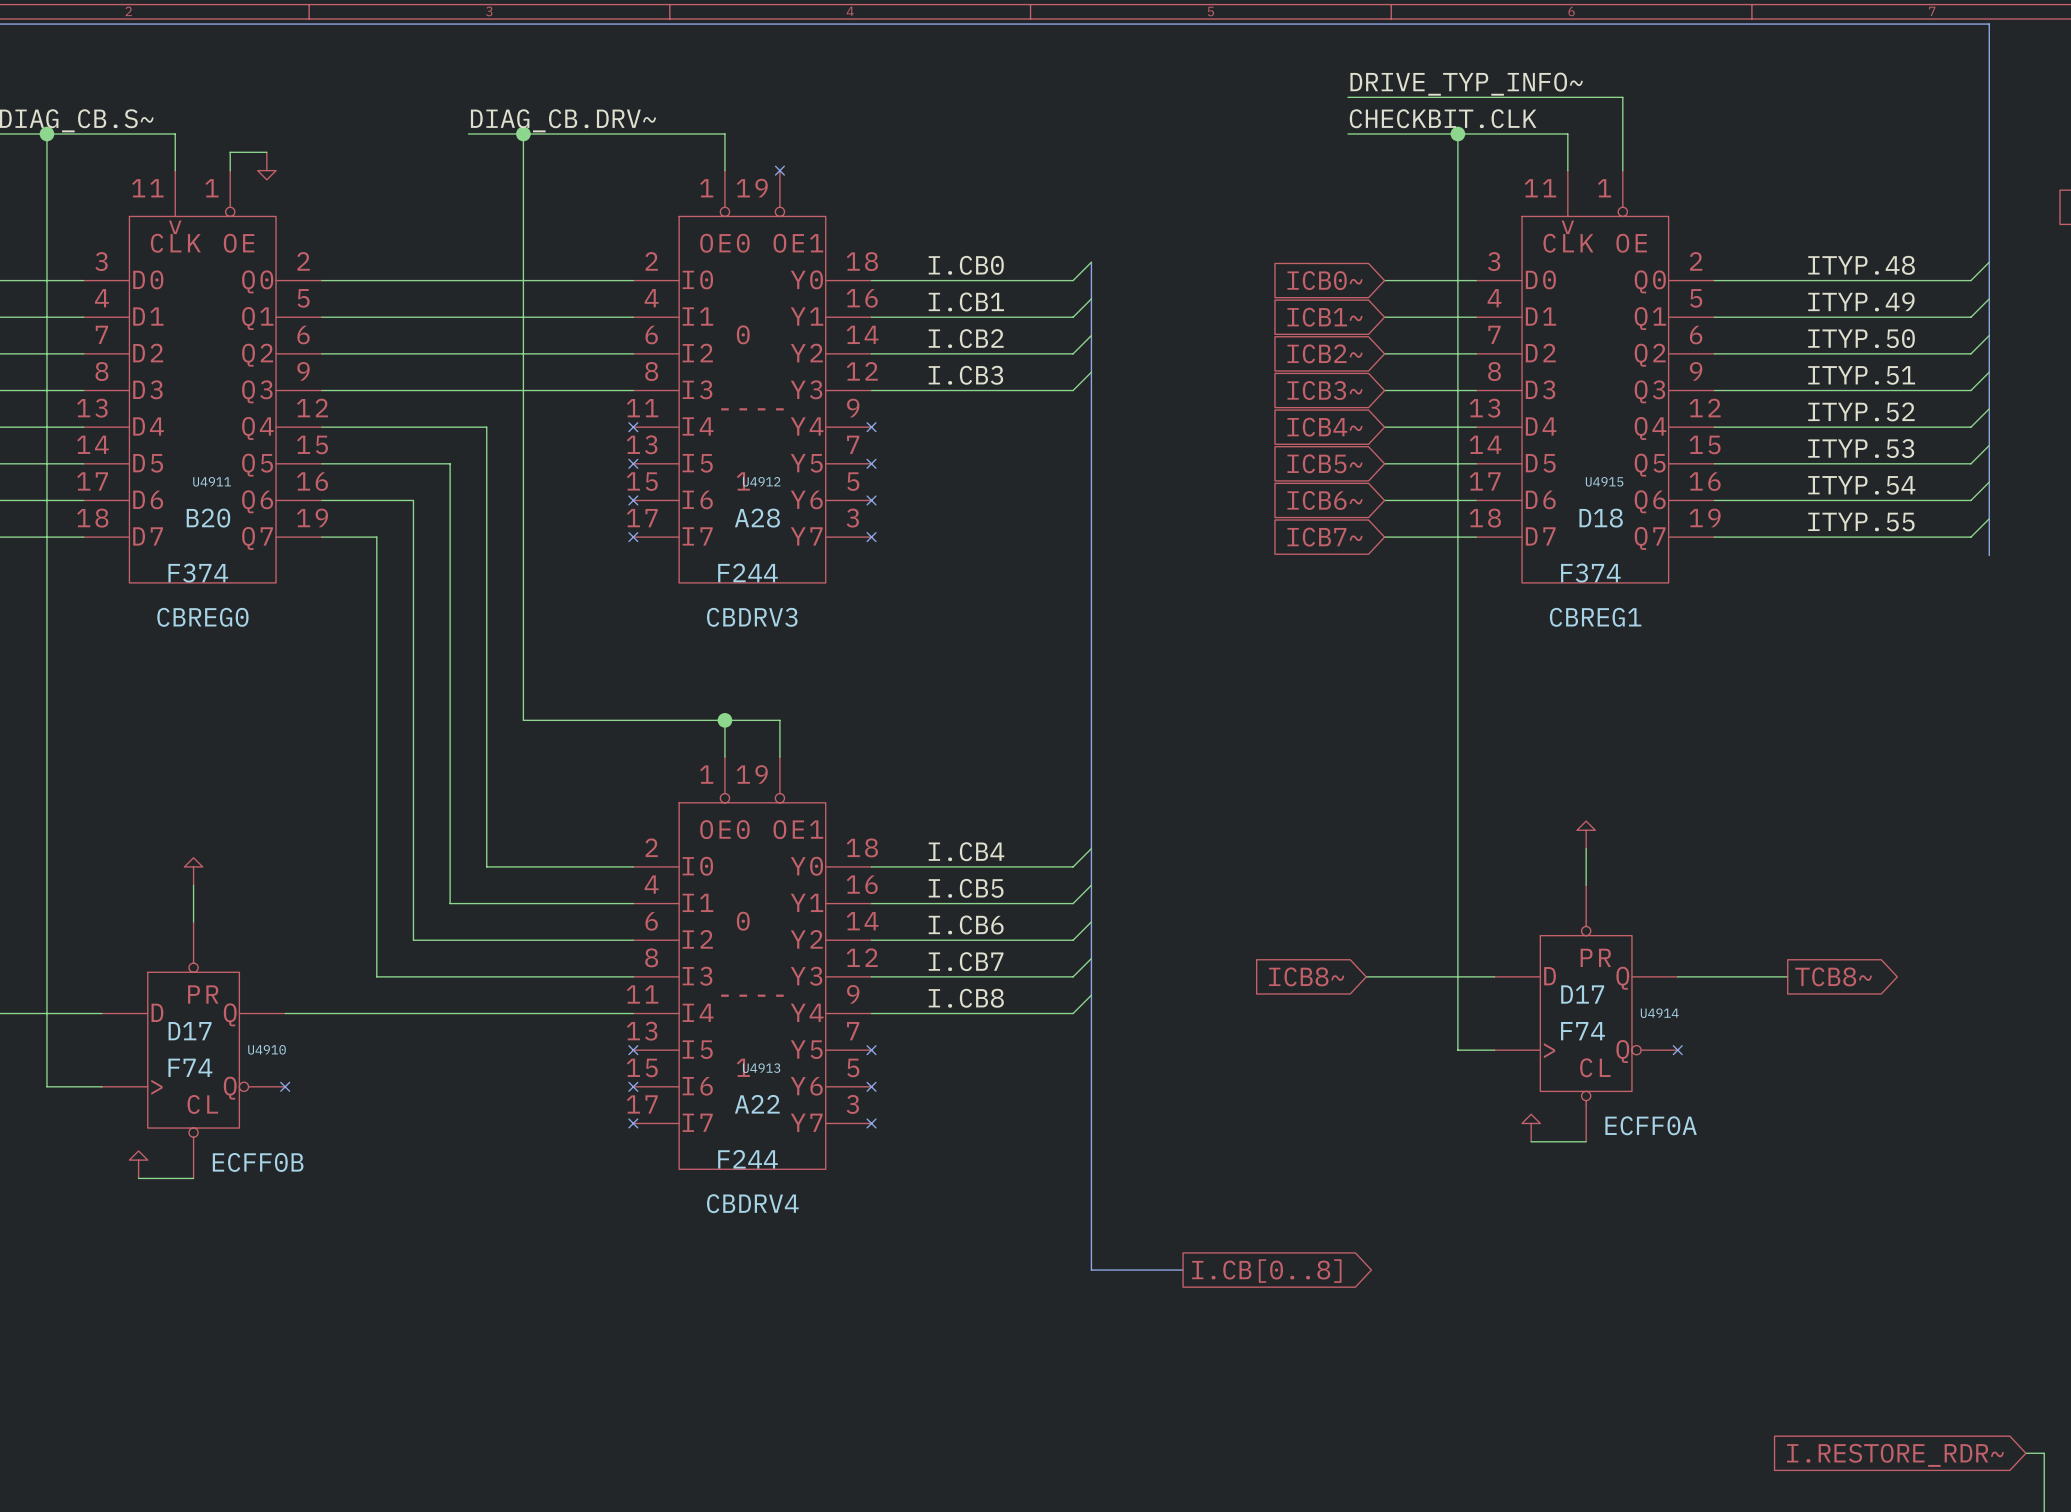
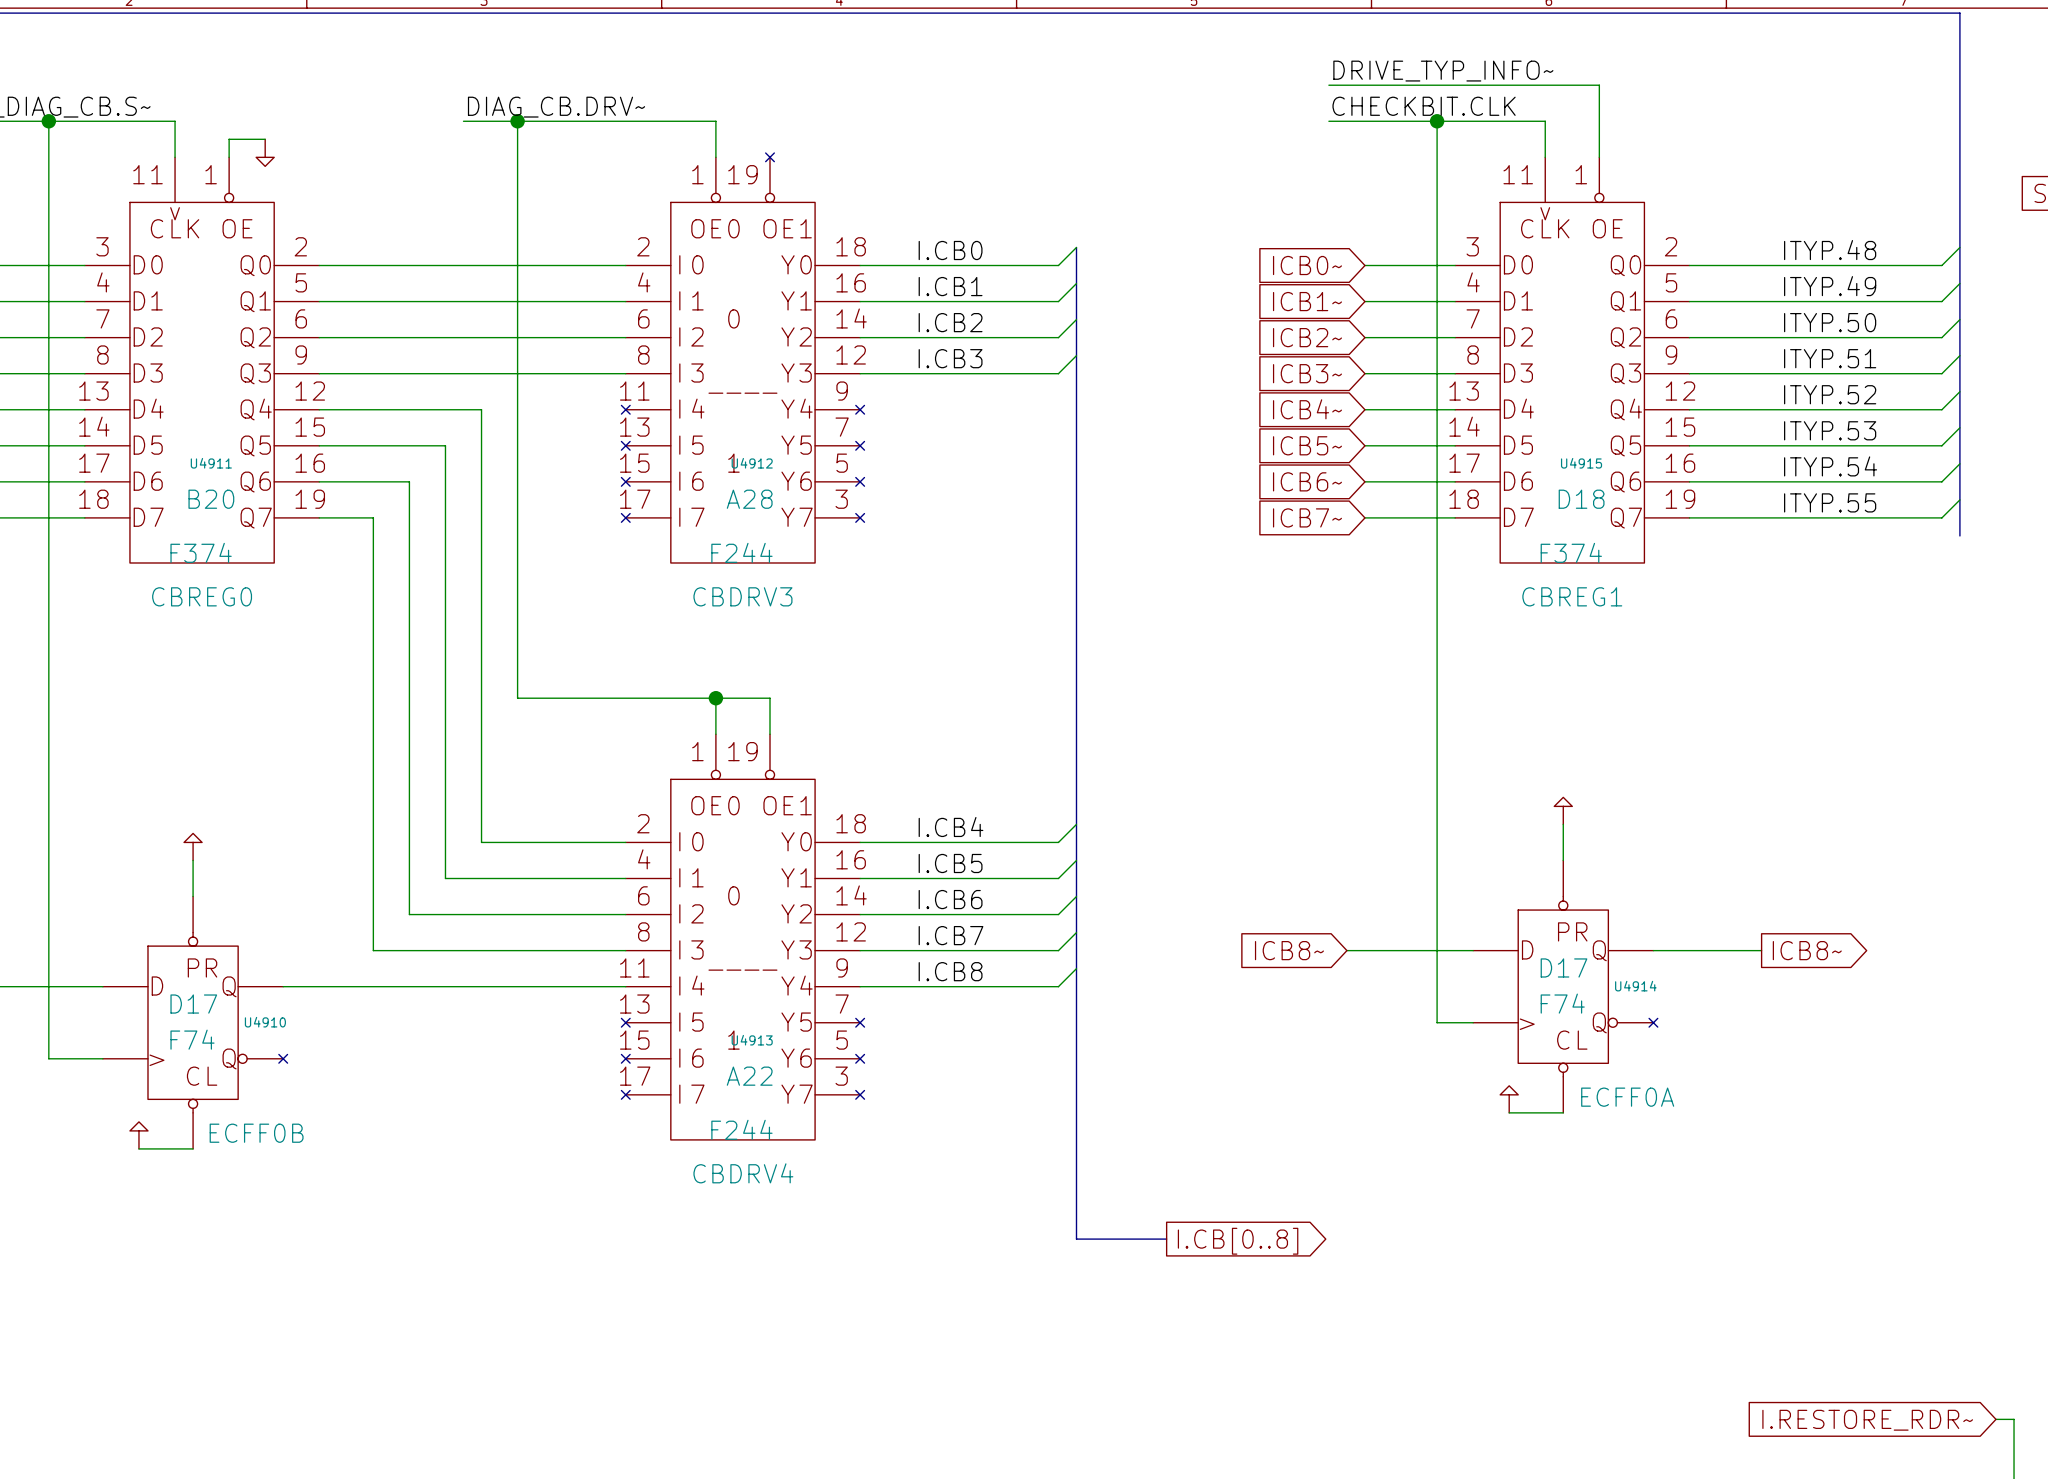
global label: TCB8~ (1833, 976) -> ICB8~ (1807, 950)

